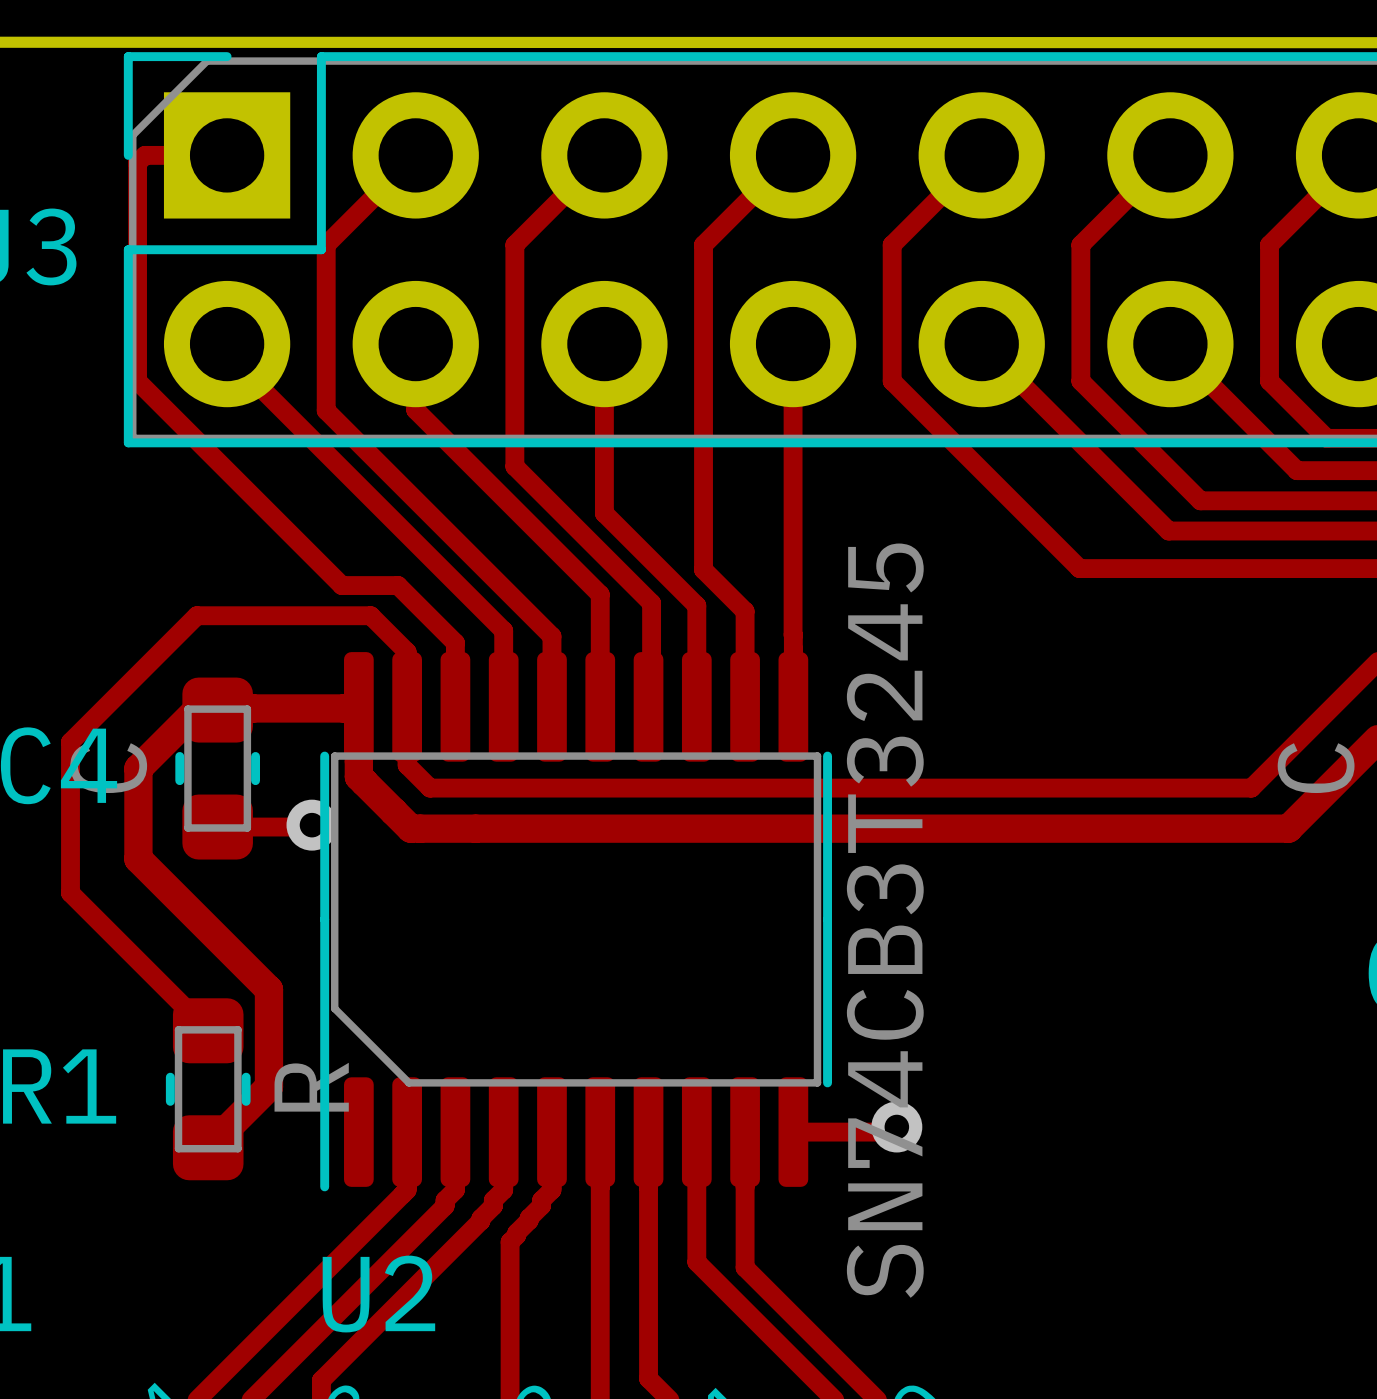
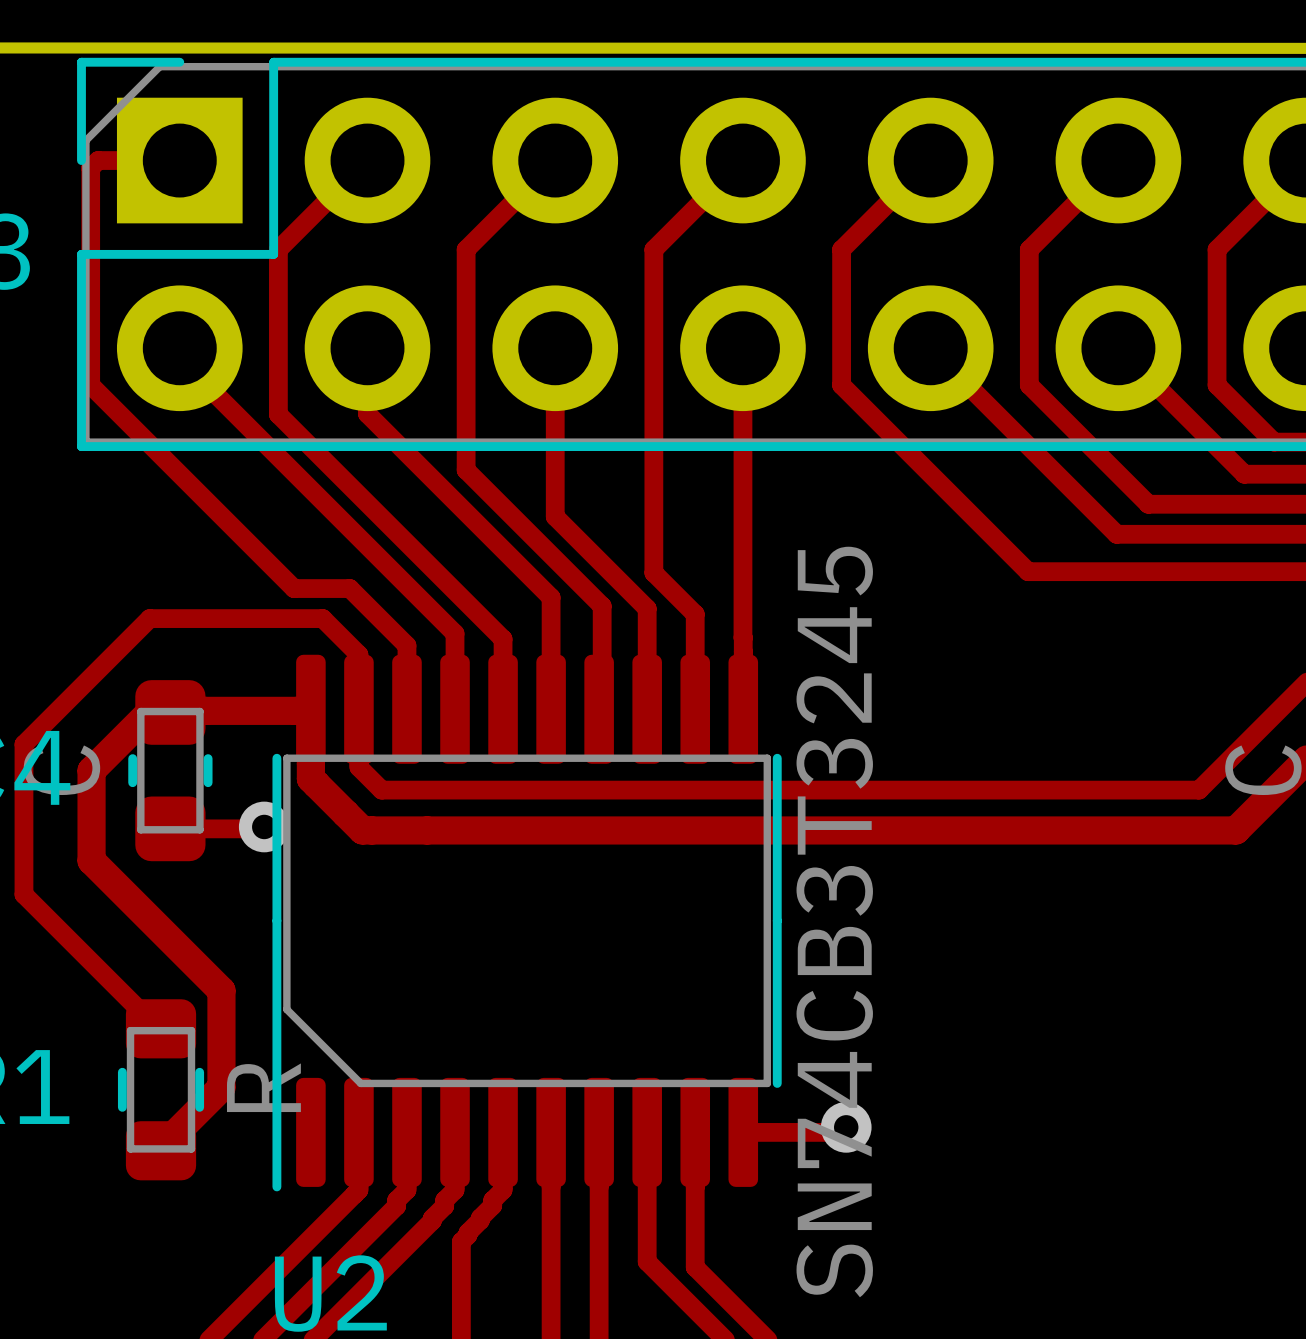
R1 footprint: [165, 998, 251, 1181] -> [117, 999, 205, 1181]

